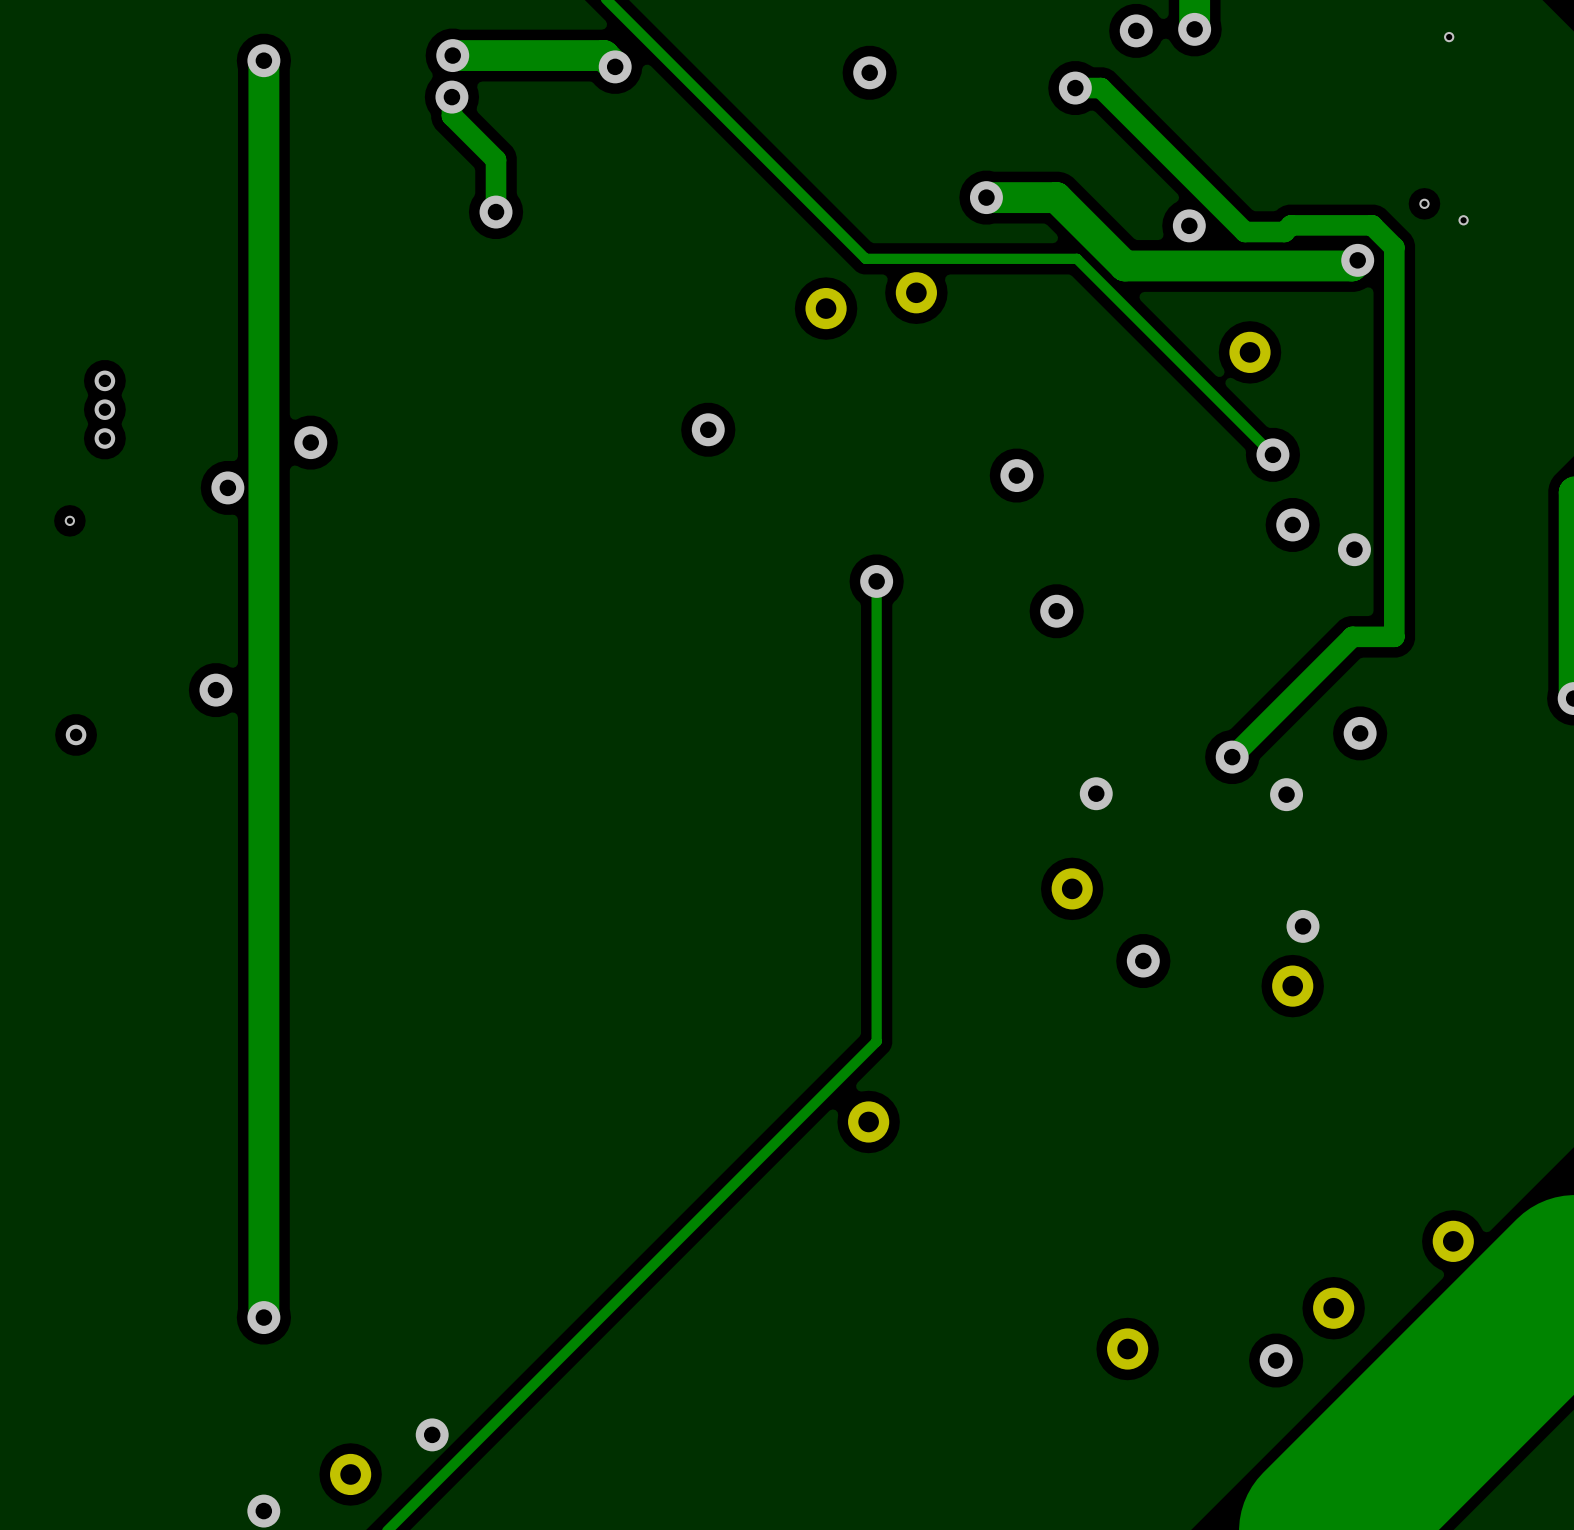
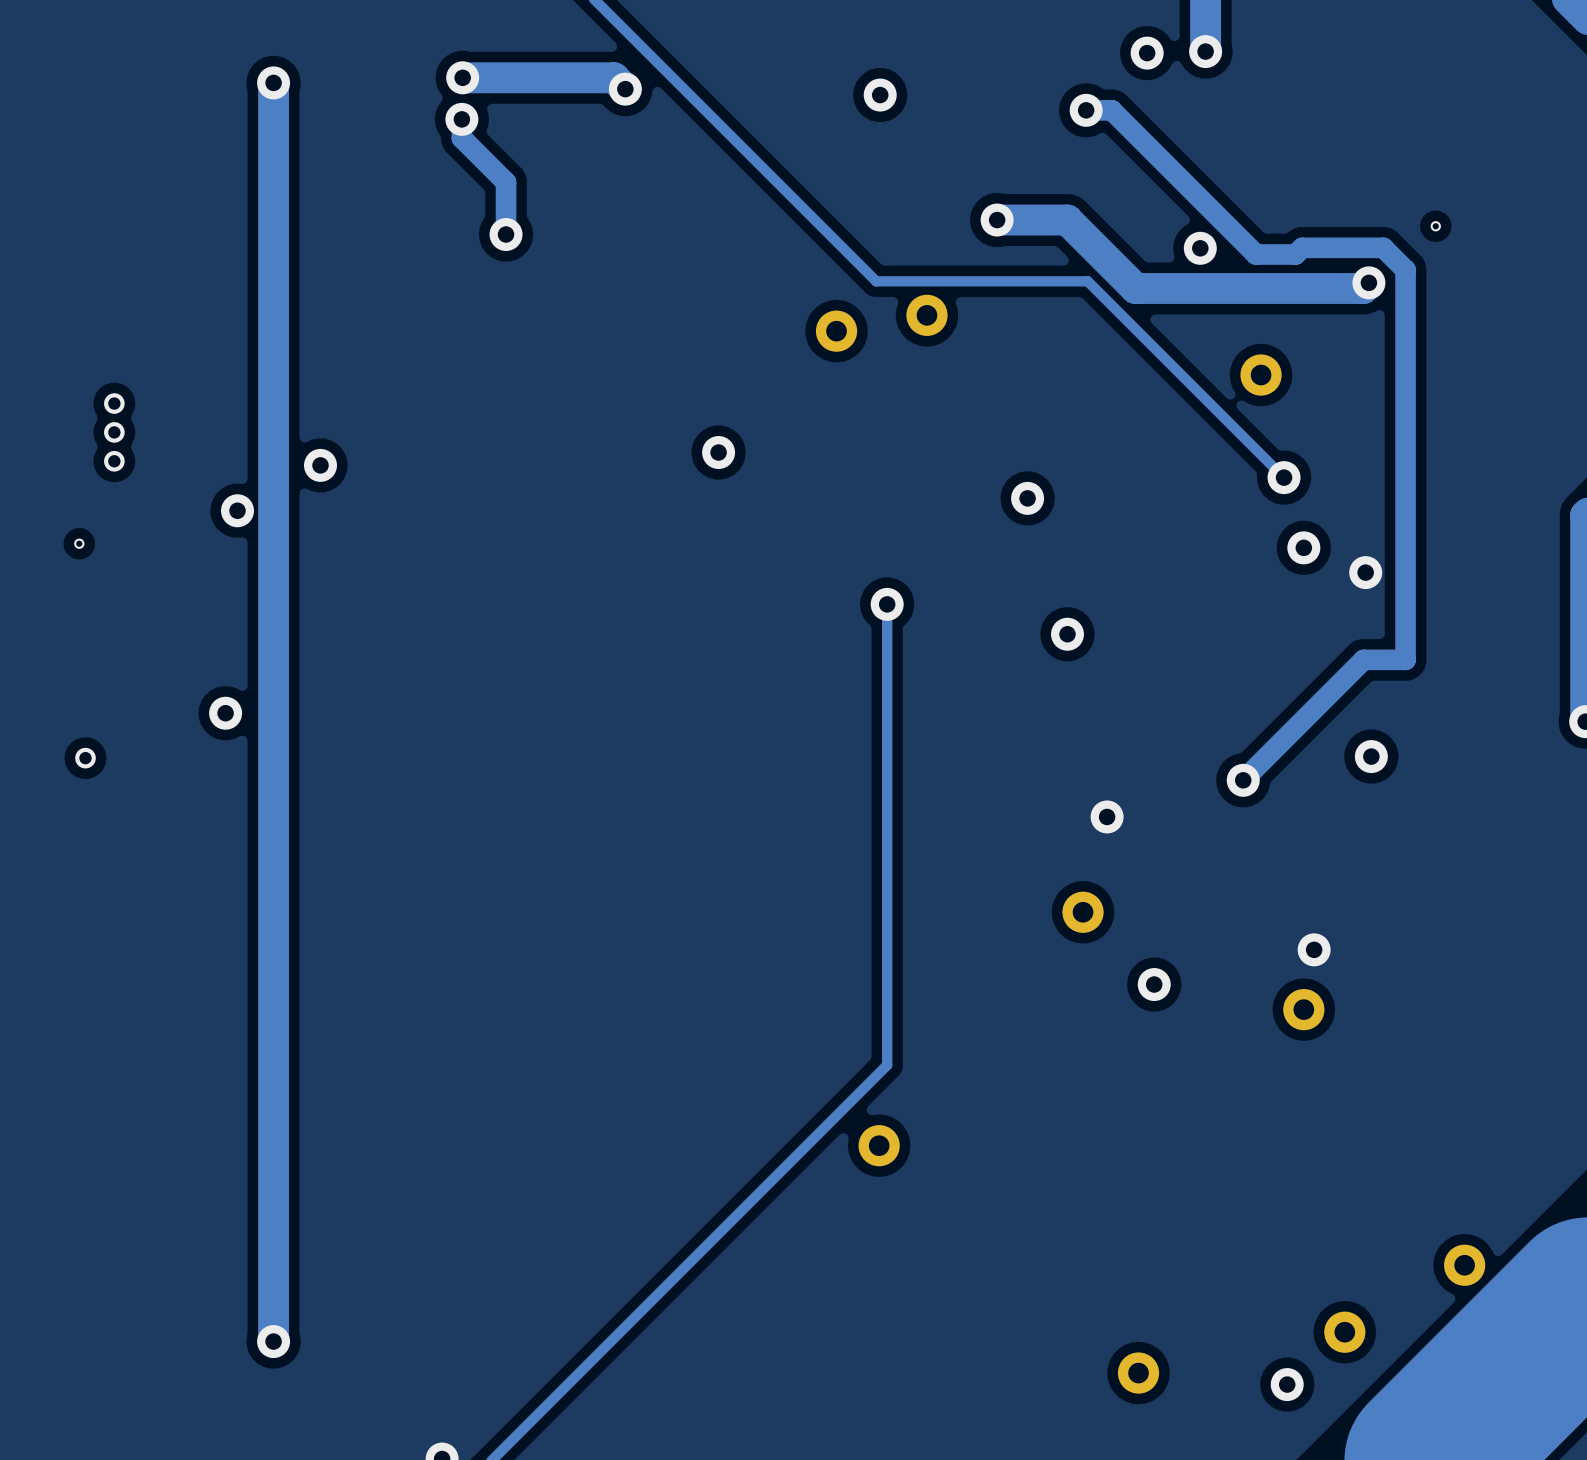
via: (1449, 37) -> none
via: (1463, 220) -> none
via: (1286, 794) -> none

